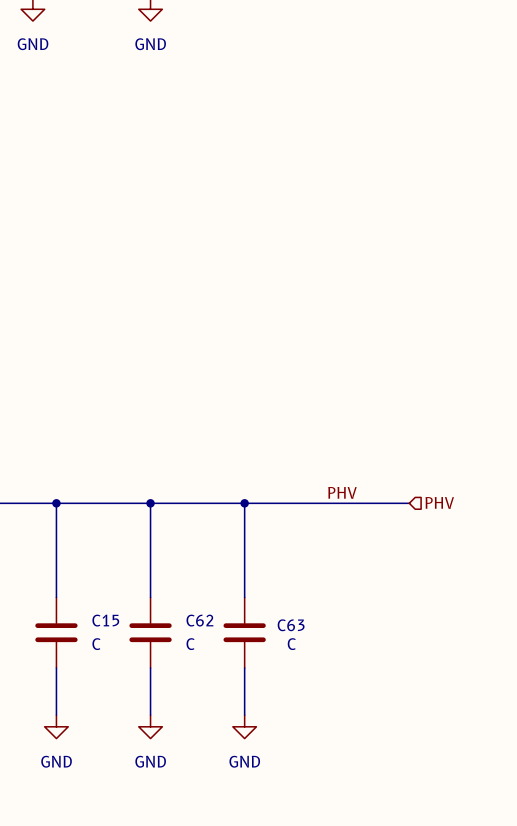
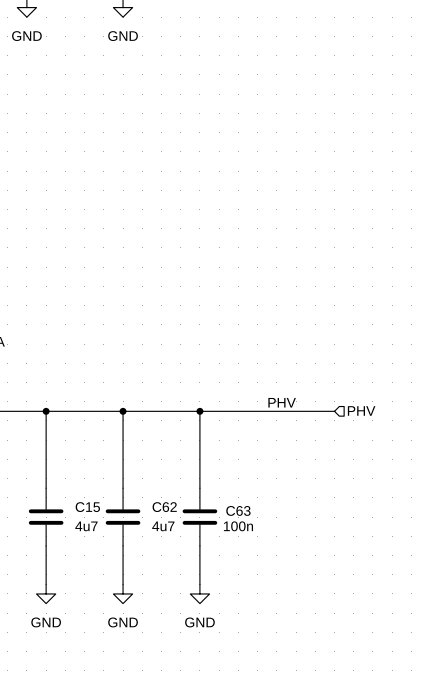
C15 value: C (96, 644) -> 4u7 (86, 526)
C62 value: C (190, 644) -> 4u7 (163, 526)
C63 value: C (291, 644) -> 100n (238, 526)

